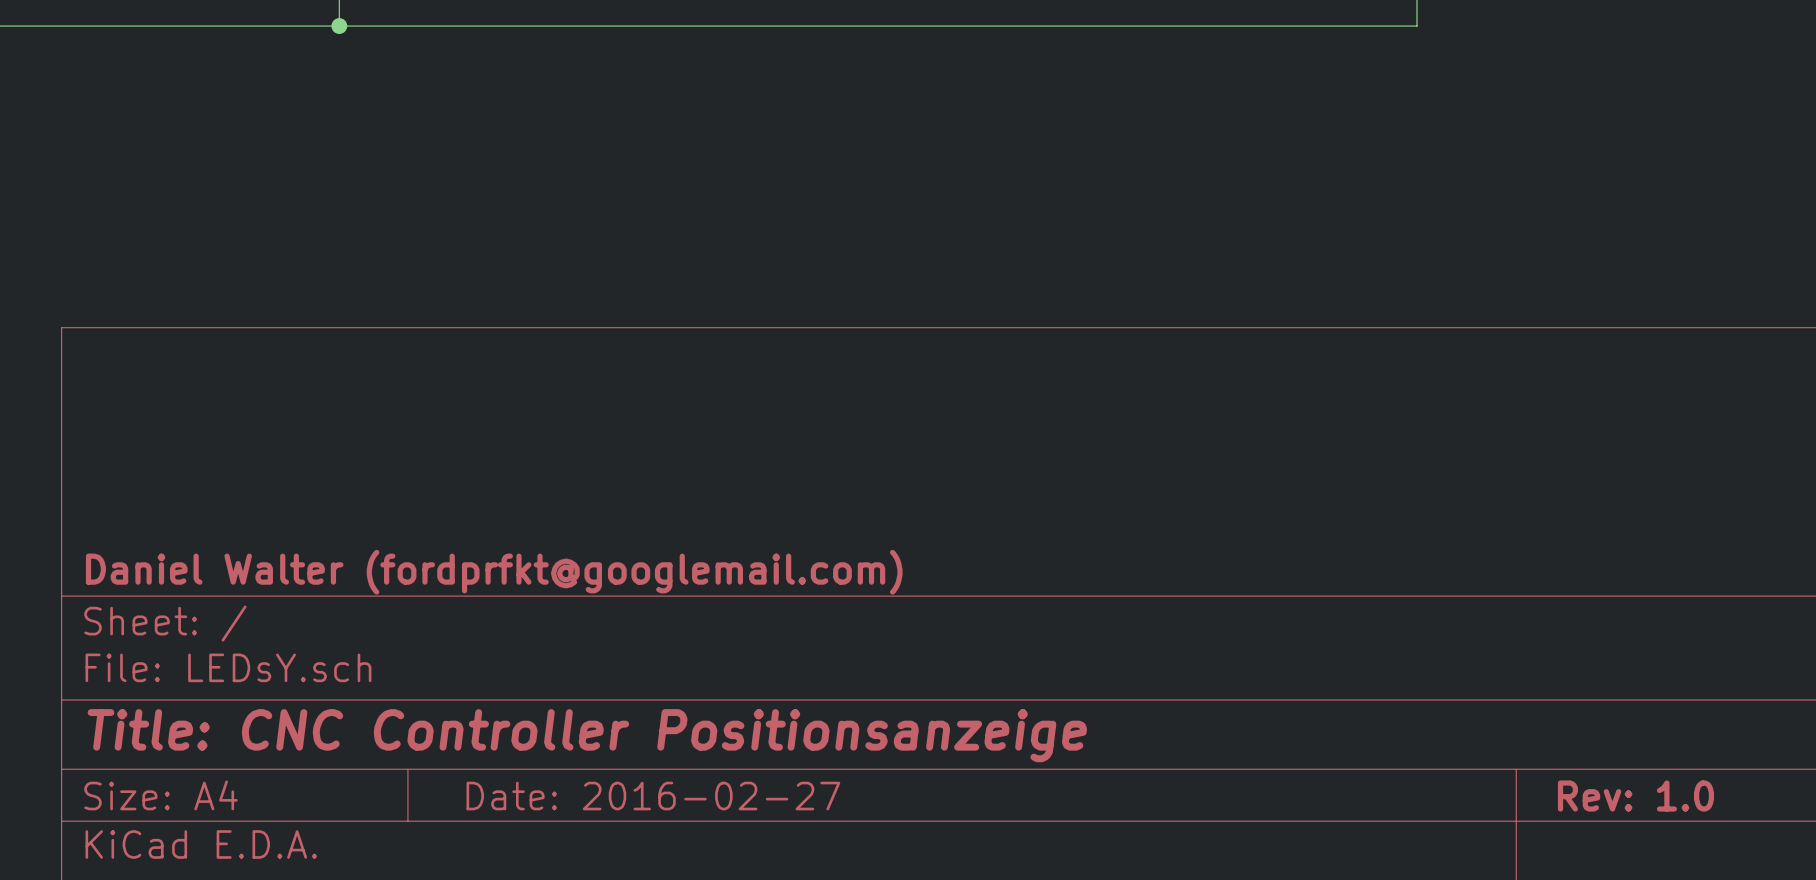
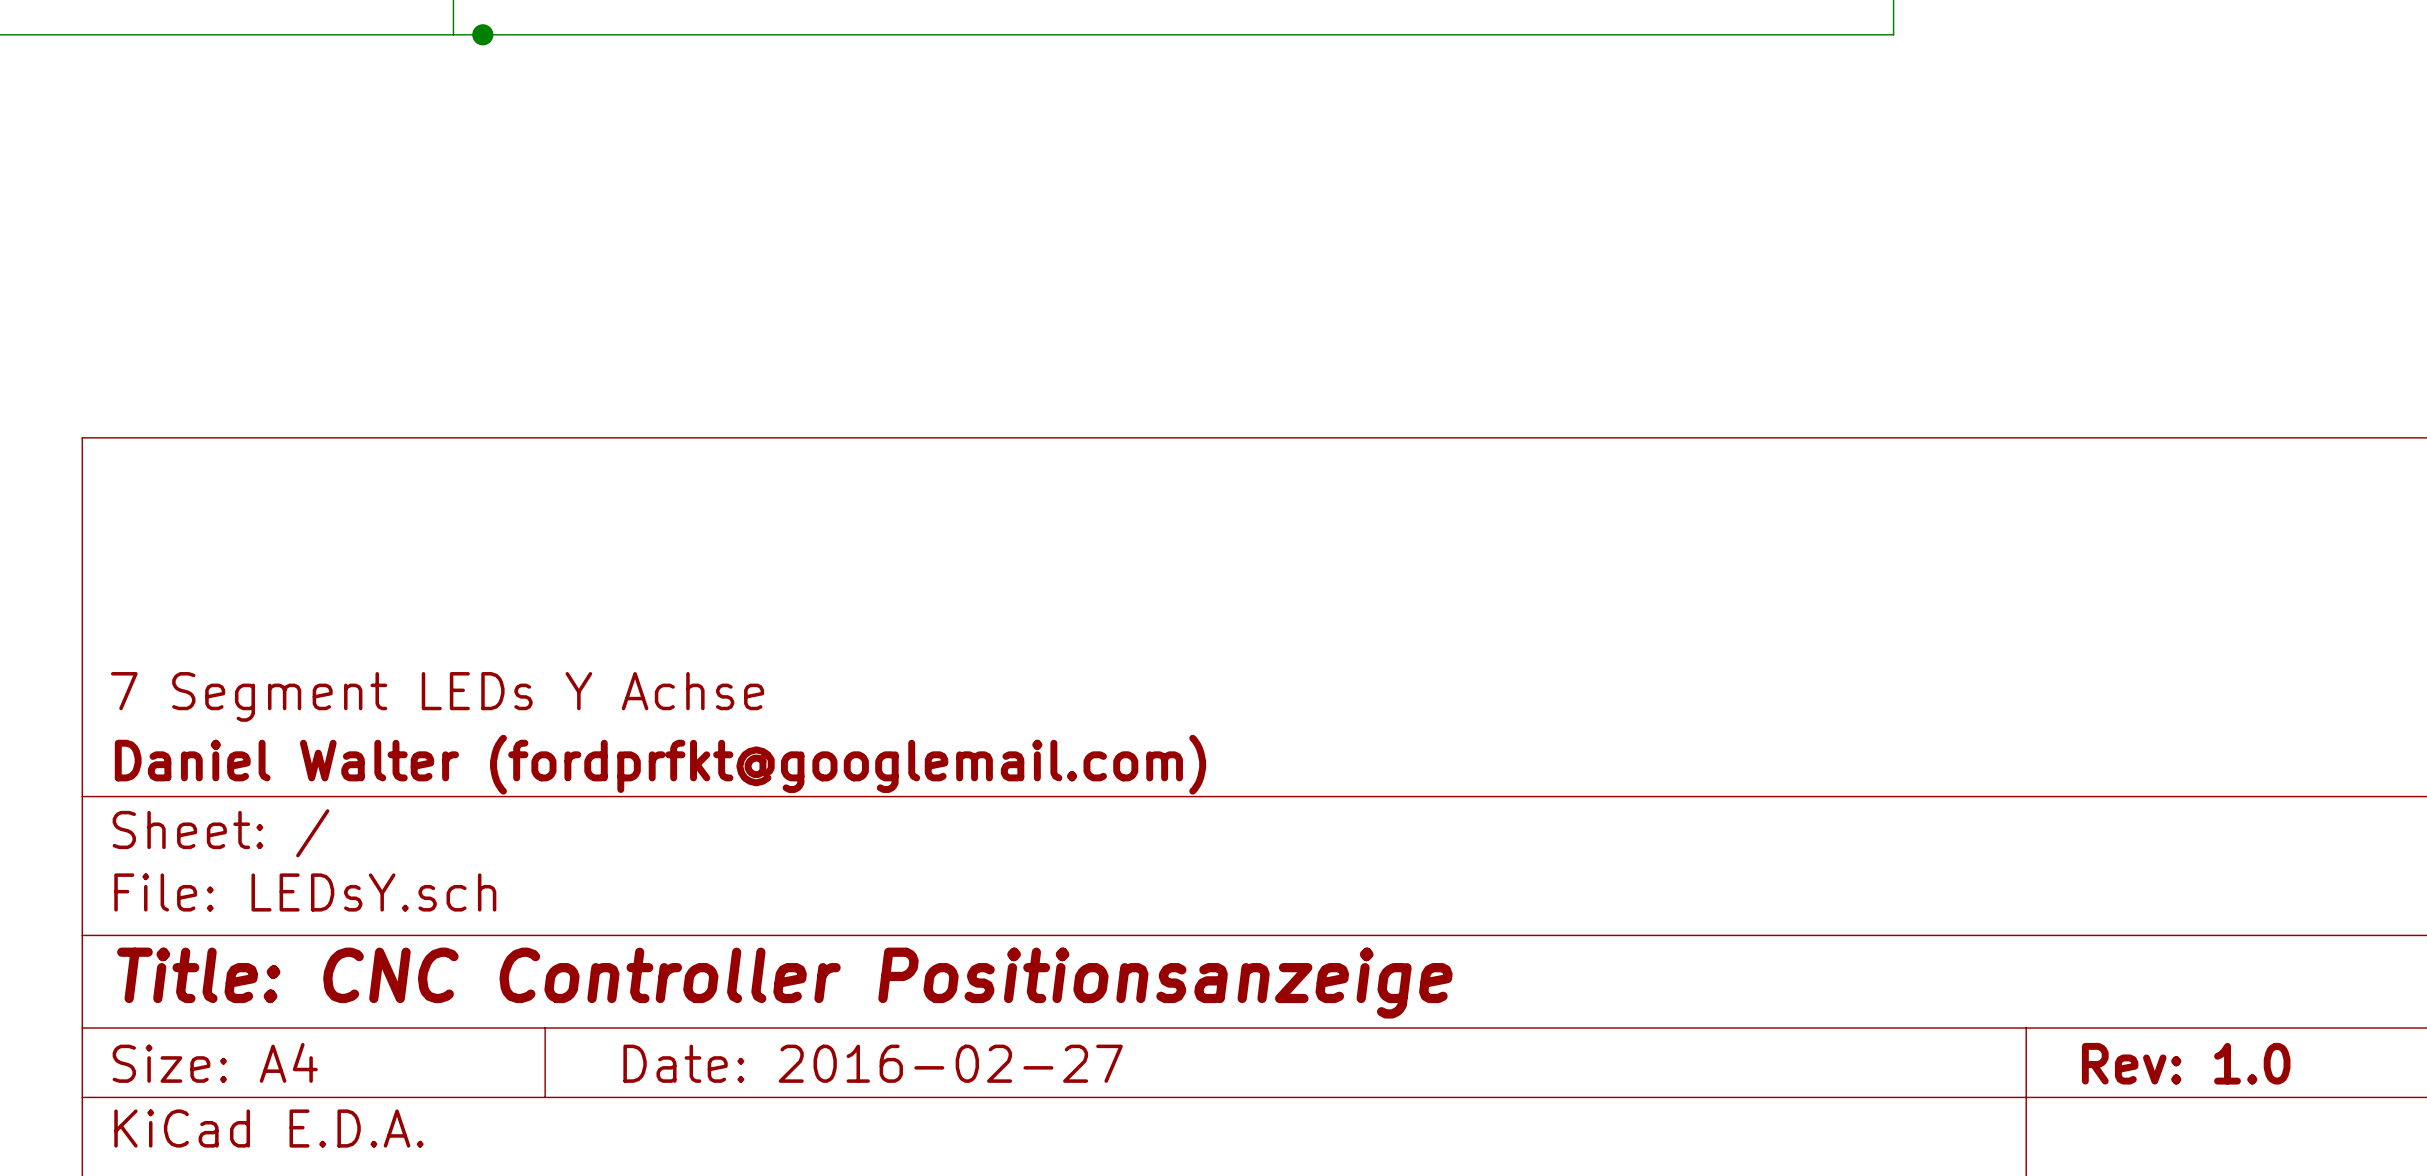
junction position: (339, 26) -> (482, 34)
title block: none -> 7 Segment LEDs Y Achse (437, 696)

